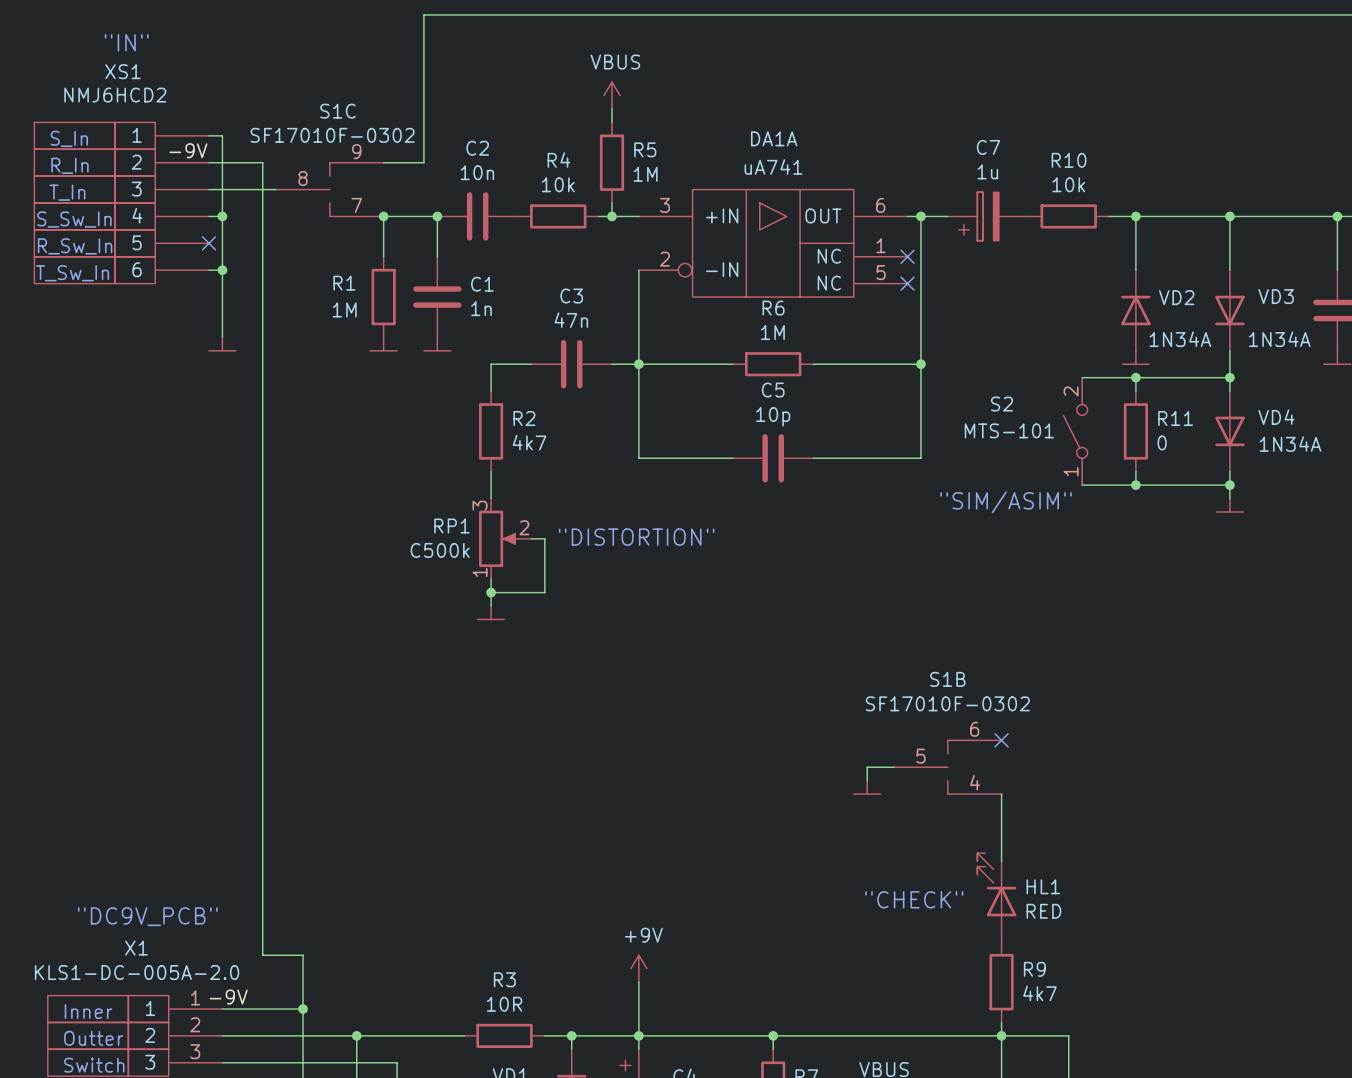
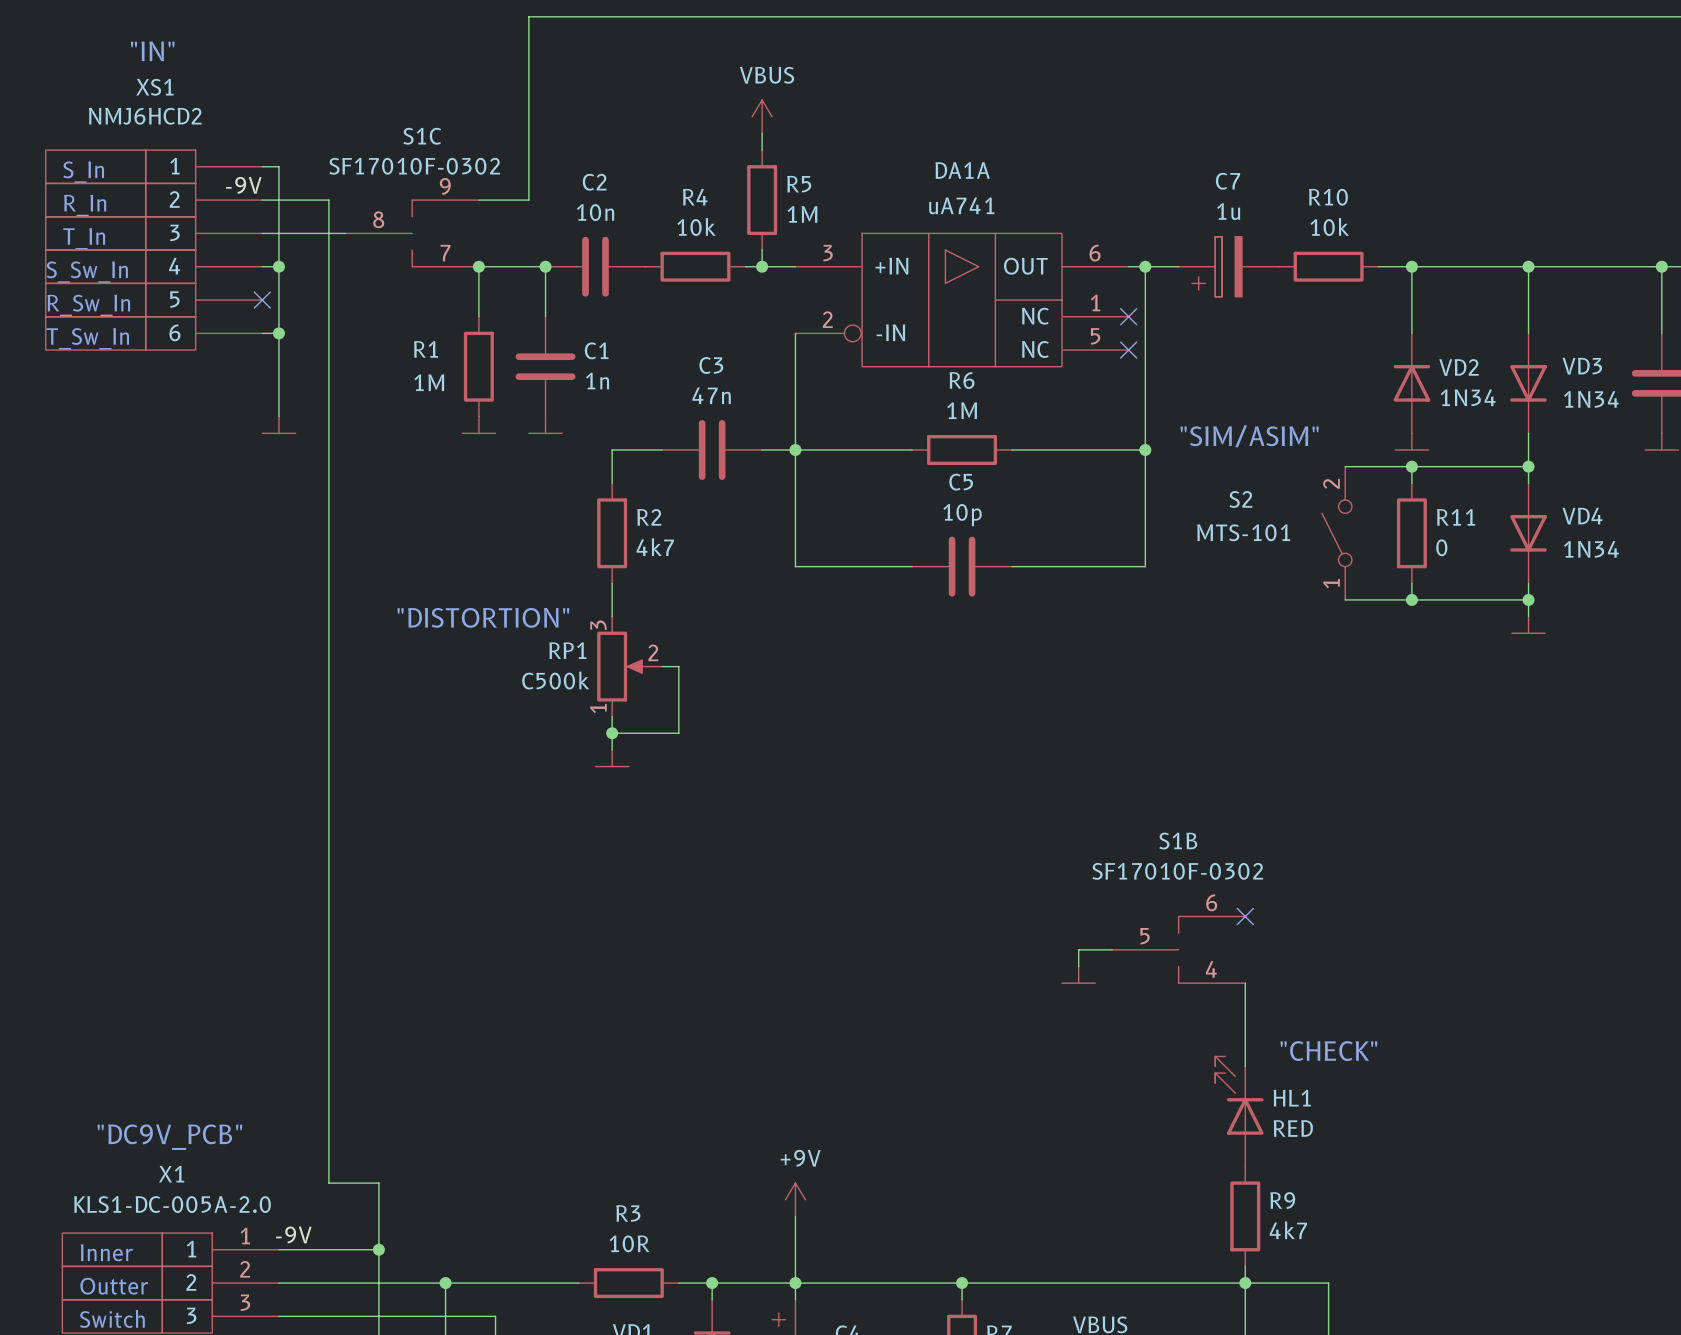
VD2 value: 1N34A (1180, 339) -> 1N34 (1468, 397)
VD3 value: 1N34A (1279, 339) -> 1N34 (1591, 399)
VD4 value: 1N34A (1290, 444) -> 1N34 (1591, 549)
text position: "SIM/ASIM" (1006, 502) -> "SIM/ASIM" (1249, 436)
text position: "DISTORTION" (636, 537) -> "DISTORTION" (483, 617)
text position: "CHECK" (914, 899) -> "CHECK" (1328, 1051)

